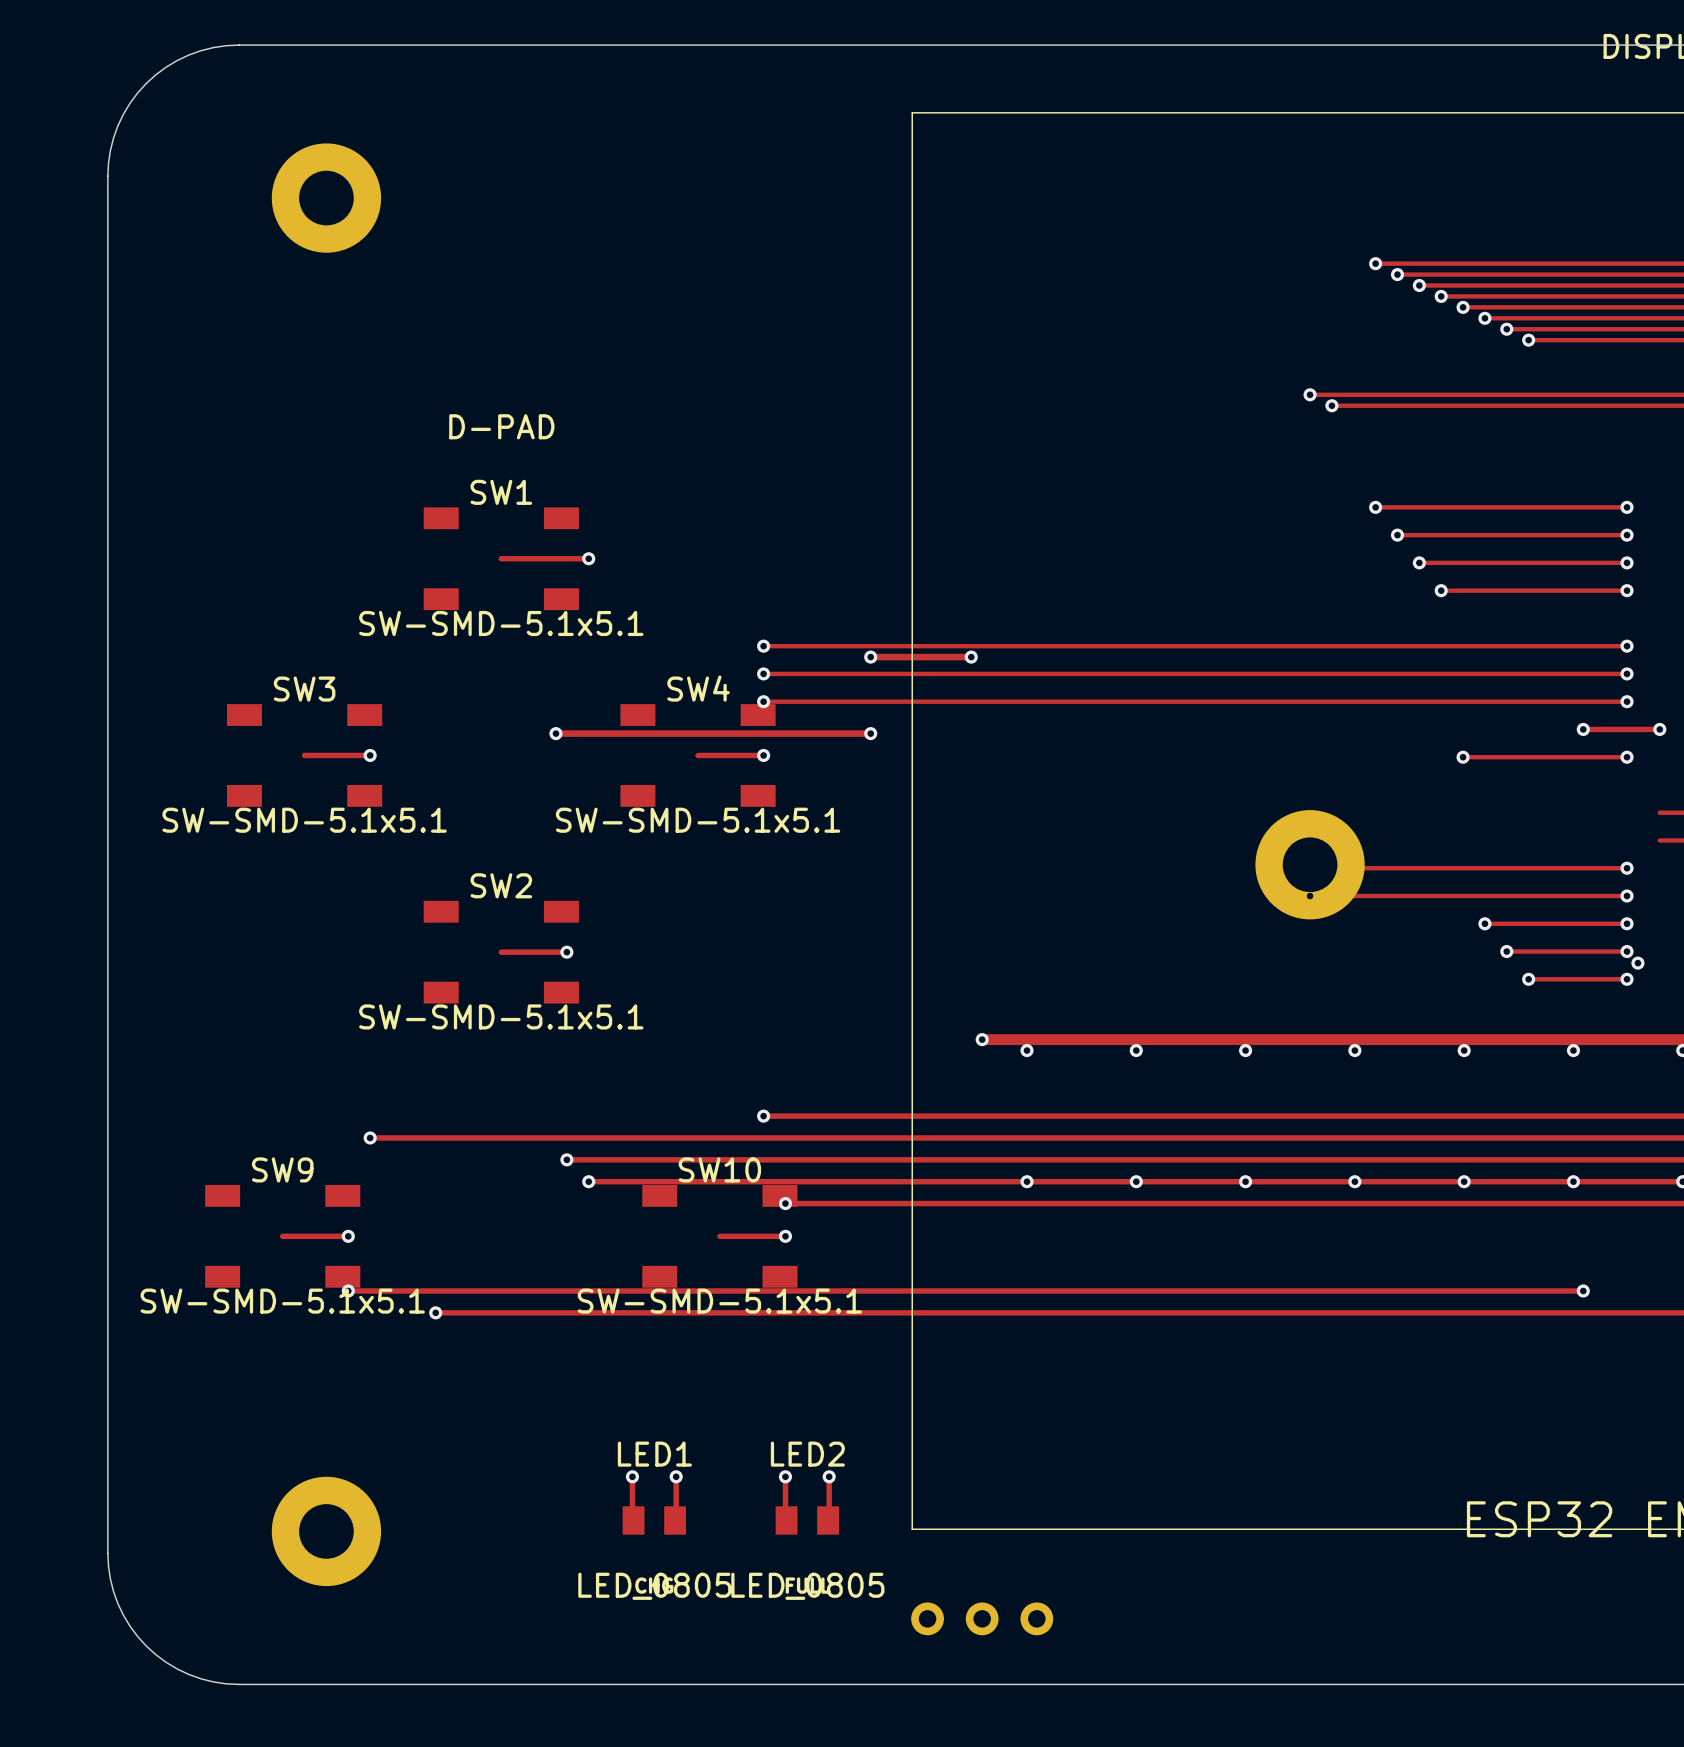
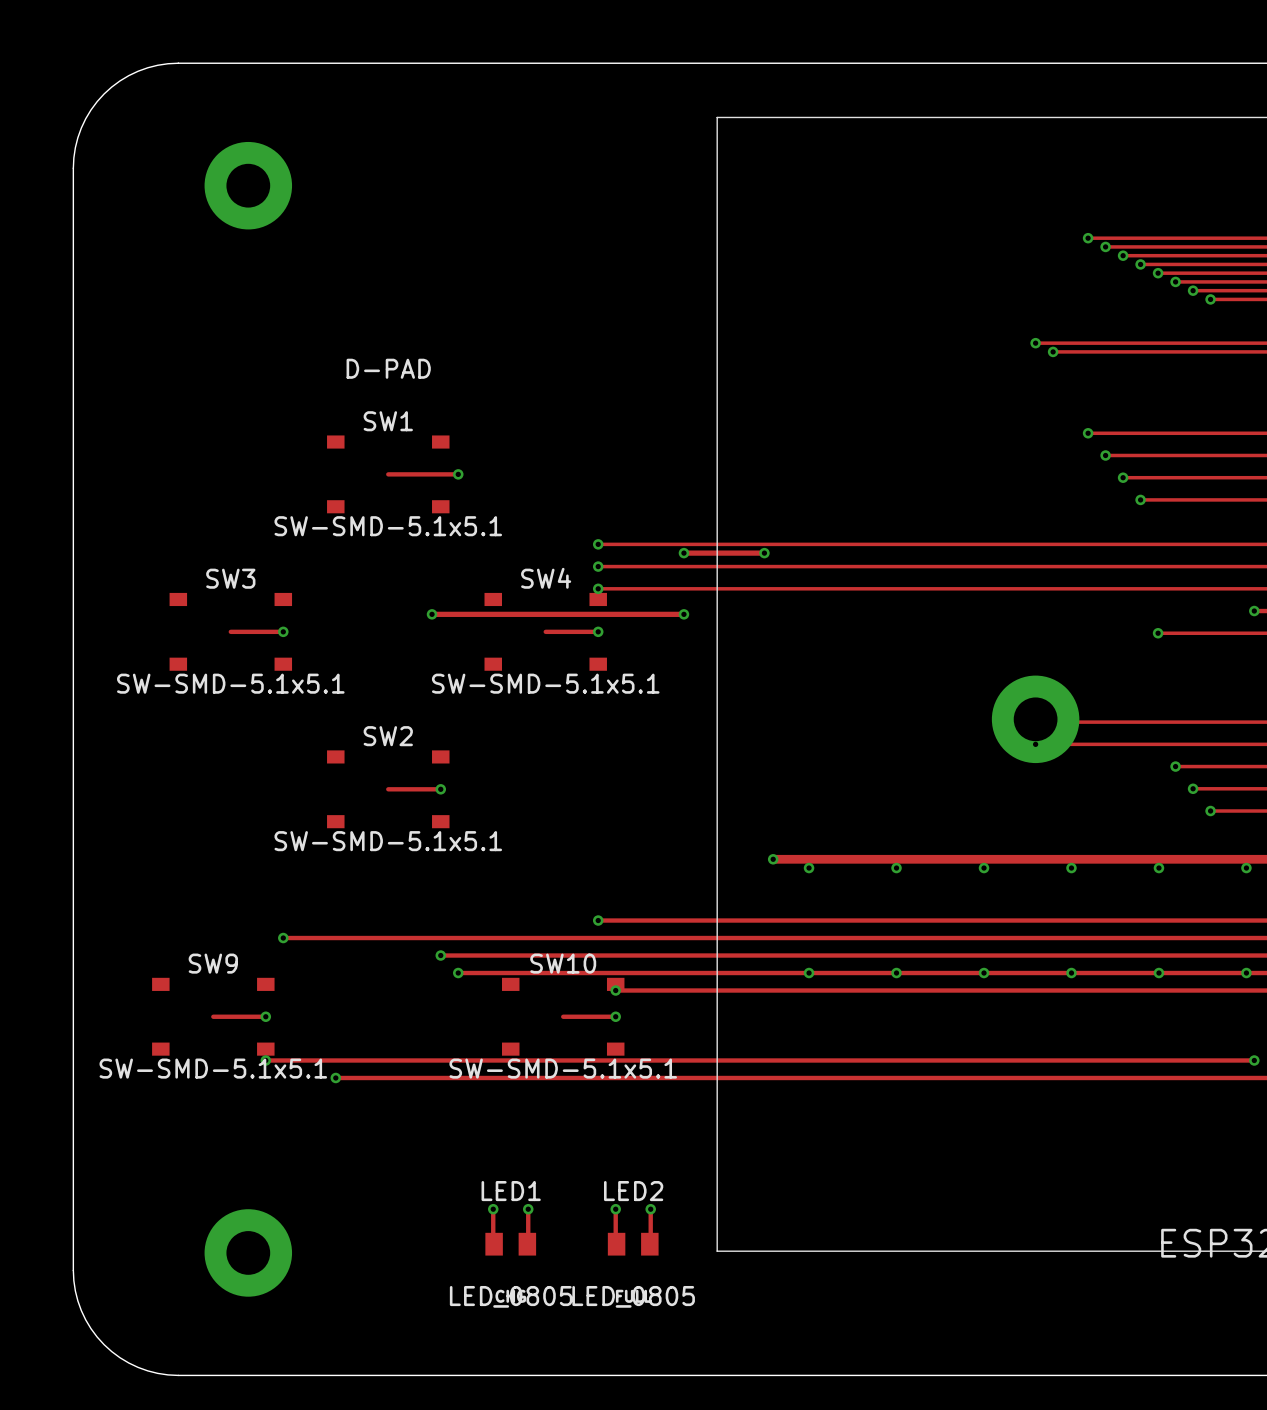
SW1 footprint: [423, 507, 579, 611] -> [327, 435, 450, 514]
SW3 footprint: [226, 704, 383, 807] -> [169, 592, 293, 671]
SW4 footprint: [620, 704, 776, 807] -> [484, 592, 607, 671]
SW2 footprint: [423, 900, 579, 1004] -> [327, 750, 450, 829]
SW9 footprint: [205, 1184, 361, 1288] -> [152, 977, 275, 1056]
SW10 footprint: [642, 1184, 798, 1288] -> [501, 977, 625, 1056]
part: (982, 1618) -> none

